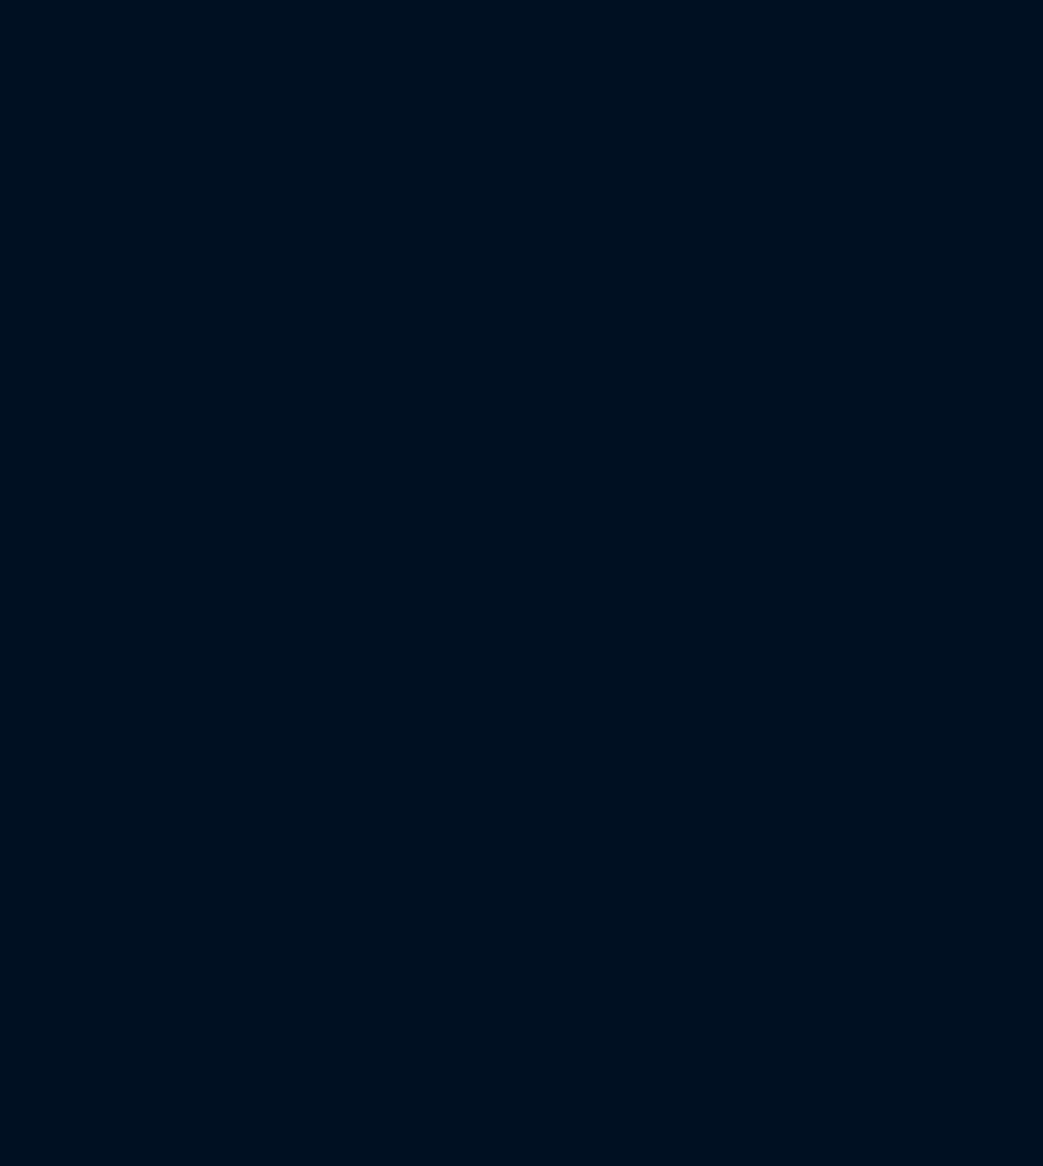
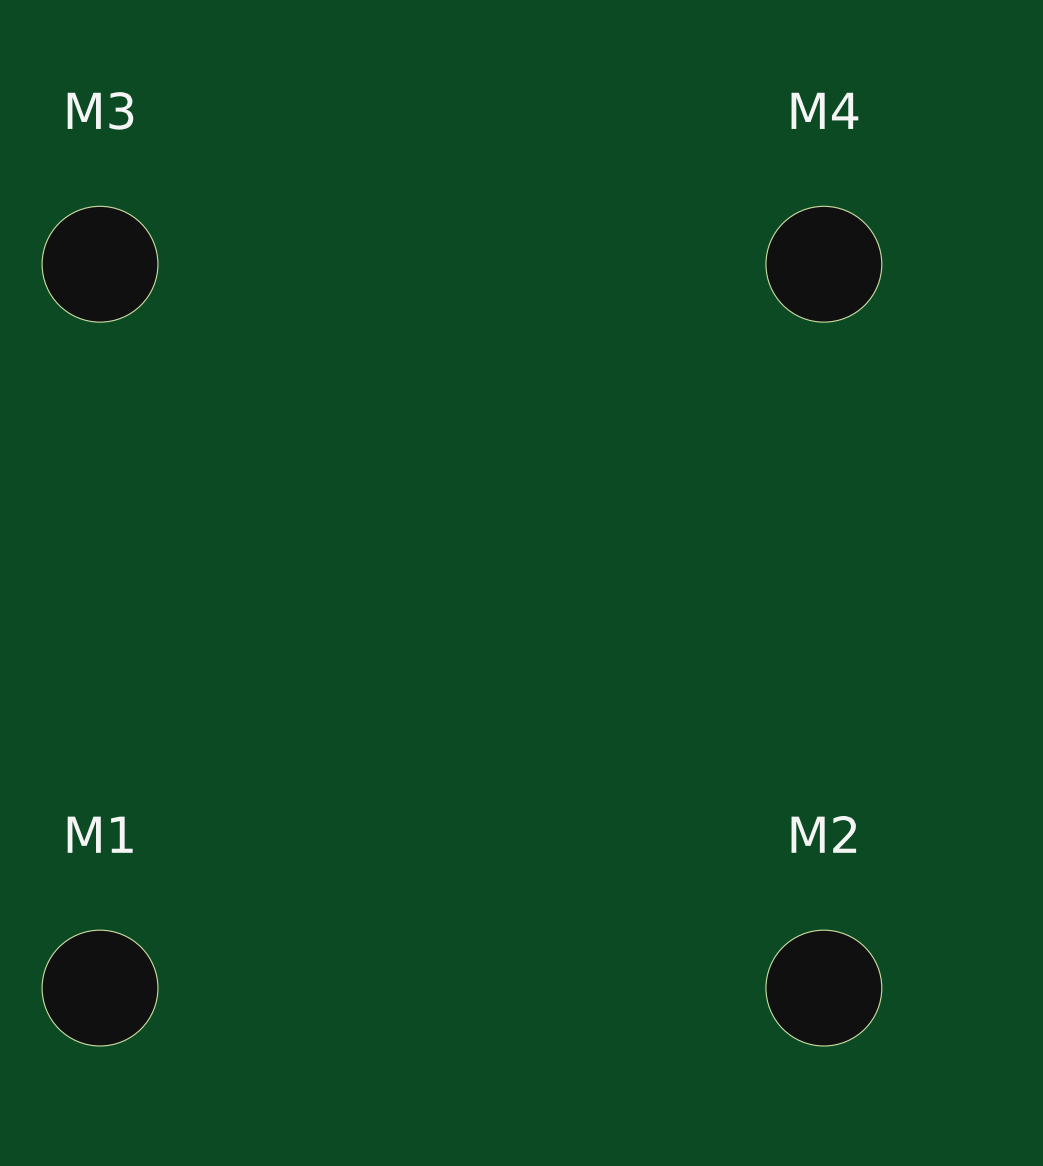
M3: none -> (100, 264)
M4: none -> (823, 264)
M1: none -> (100, 988)
M2: none -> (823, 988)

